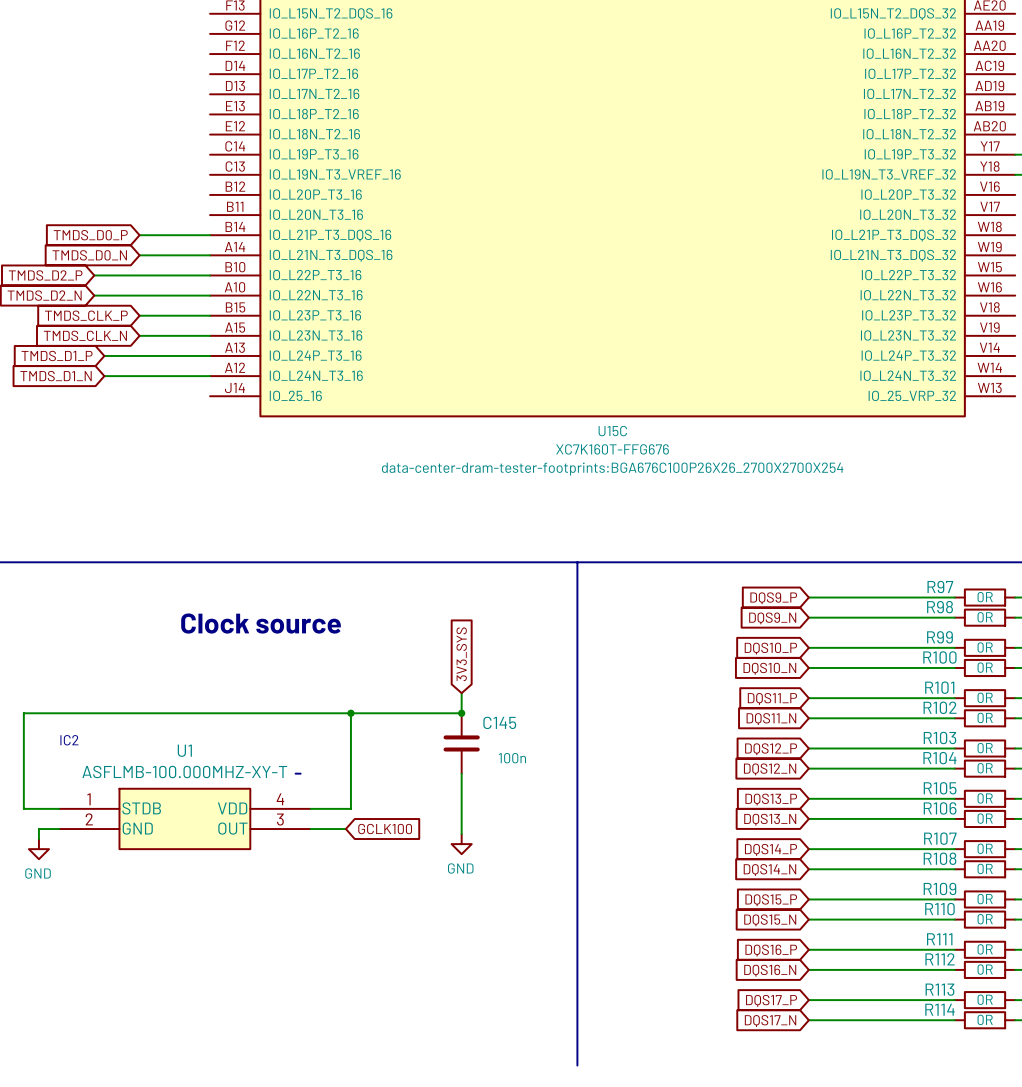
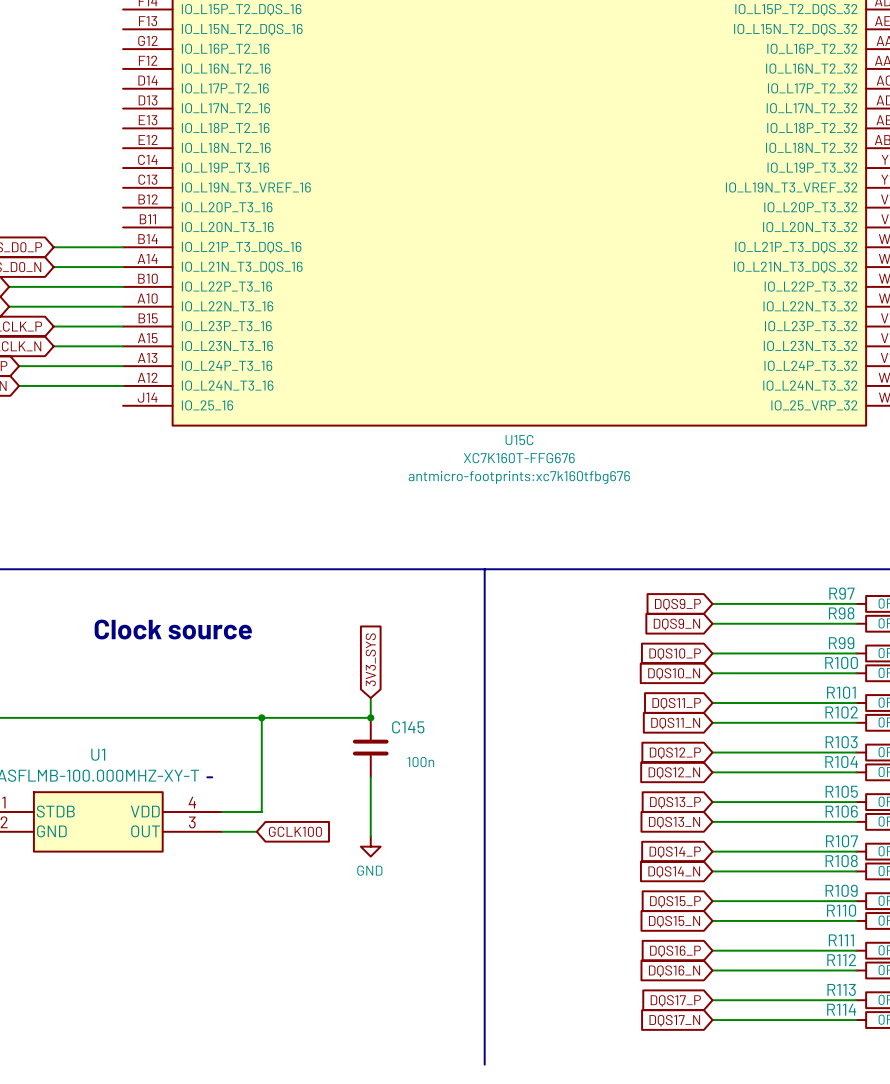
U15C text: data-center-dram-tester-footprints:BGA676C100P26X26_2700X2700X254 (612, 469) -> antmicro-footprints:xc7k160tfbg676 (519, 477)

